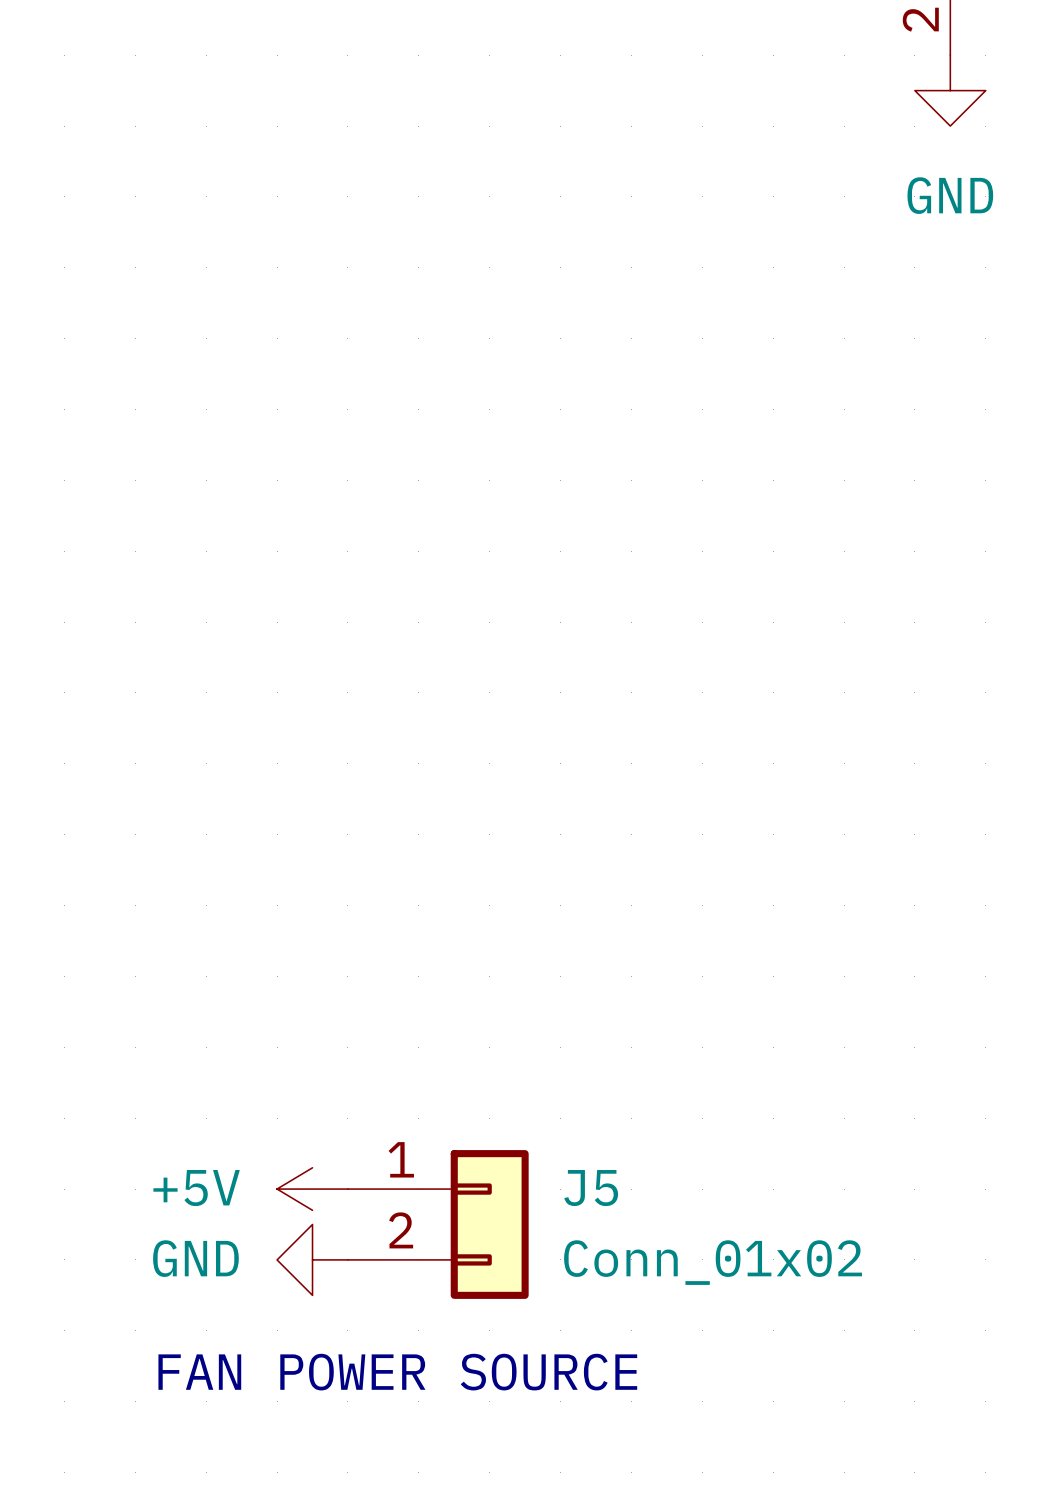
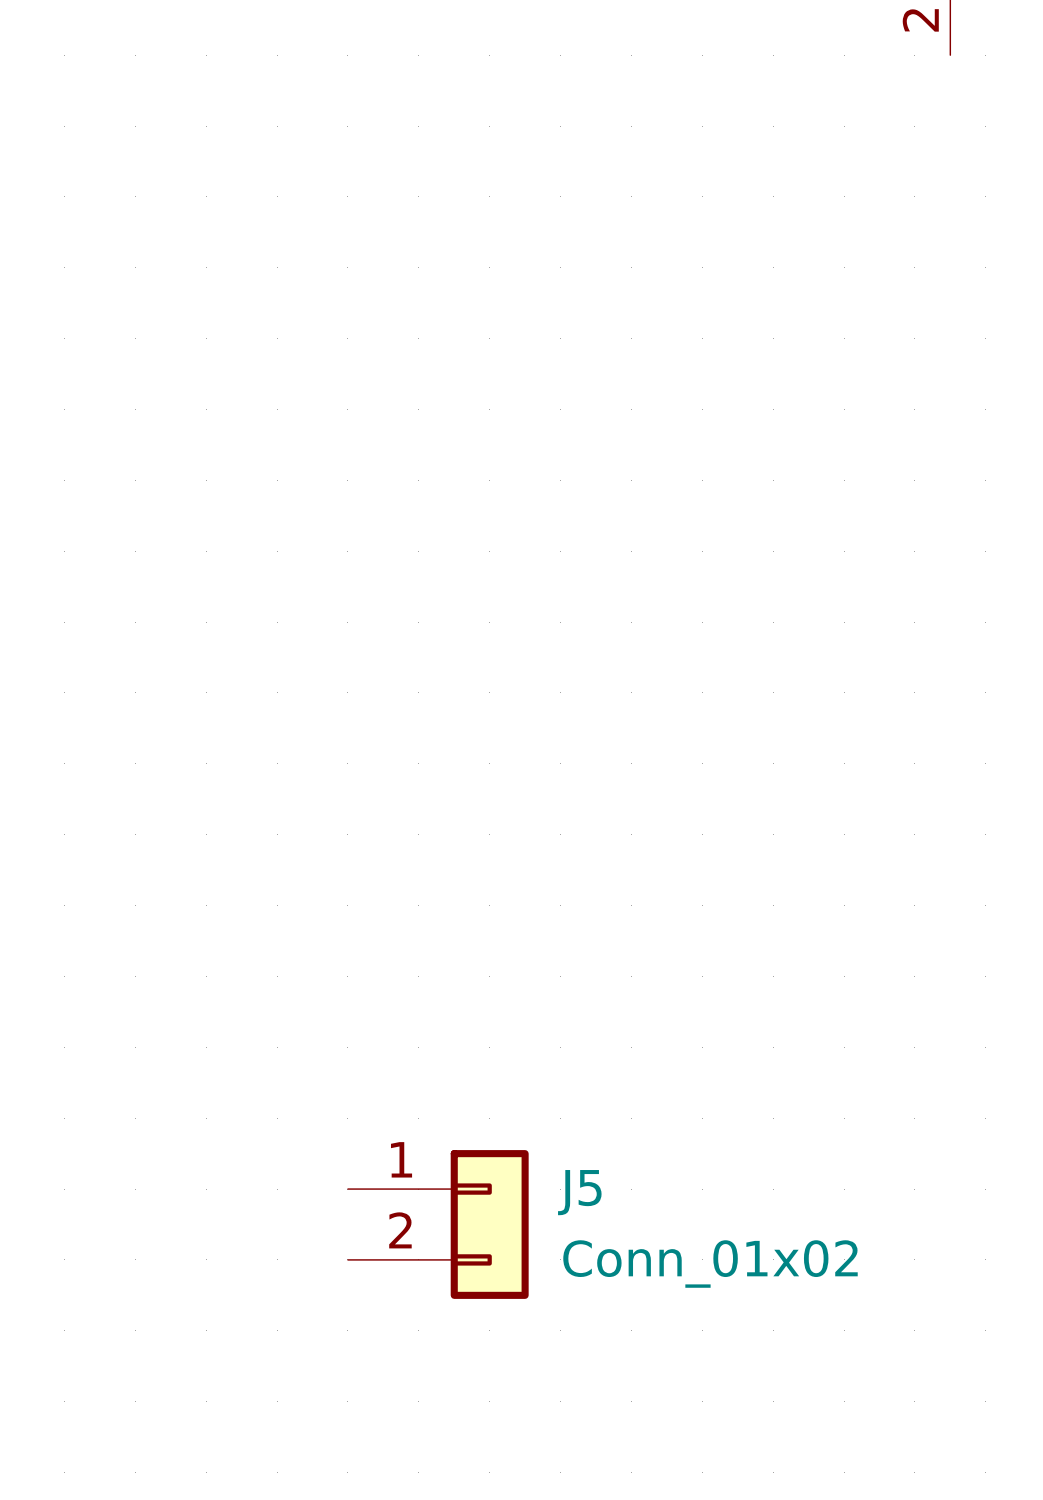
power symbol: GND (950, 90) -> none
power symbol: +5V (312, 1189) -> none
power symbol: GND (312, 1259) -> none
text: FAN POWER SOURCE (397, 1372) -> none

